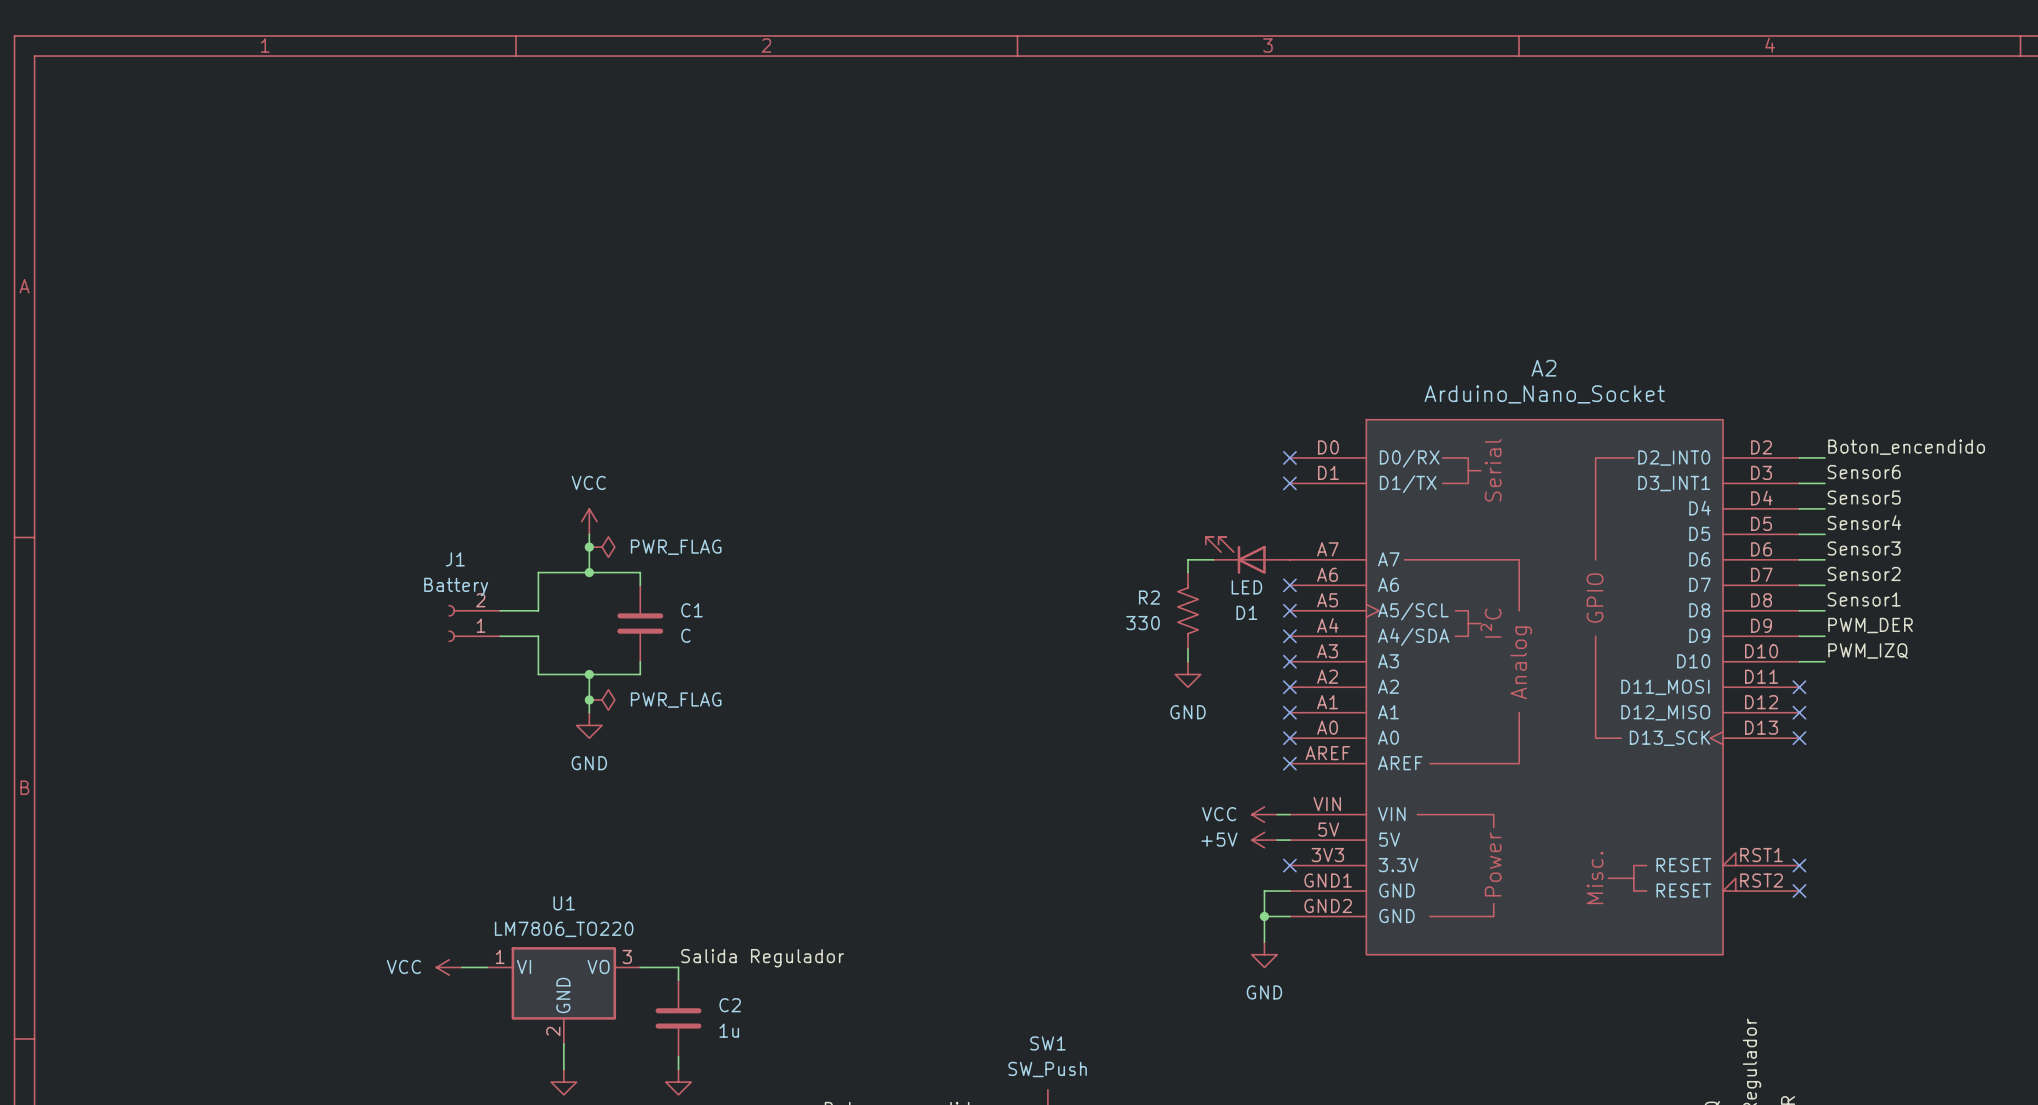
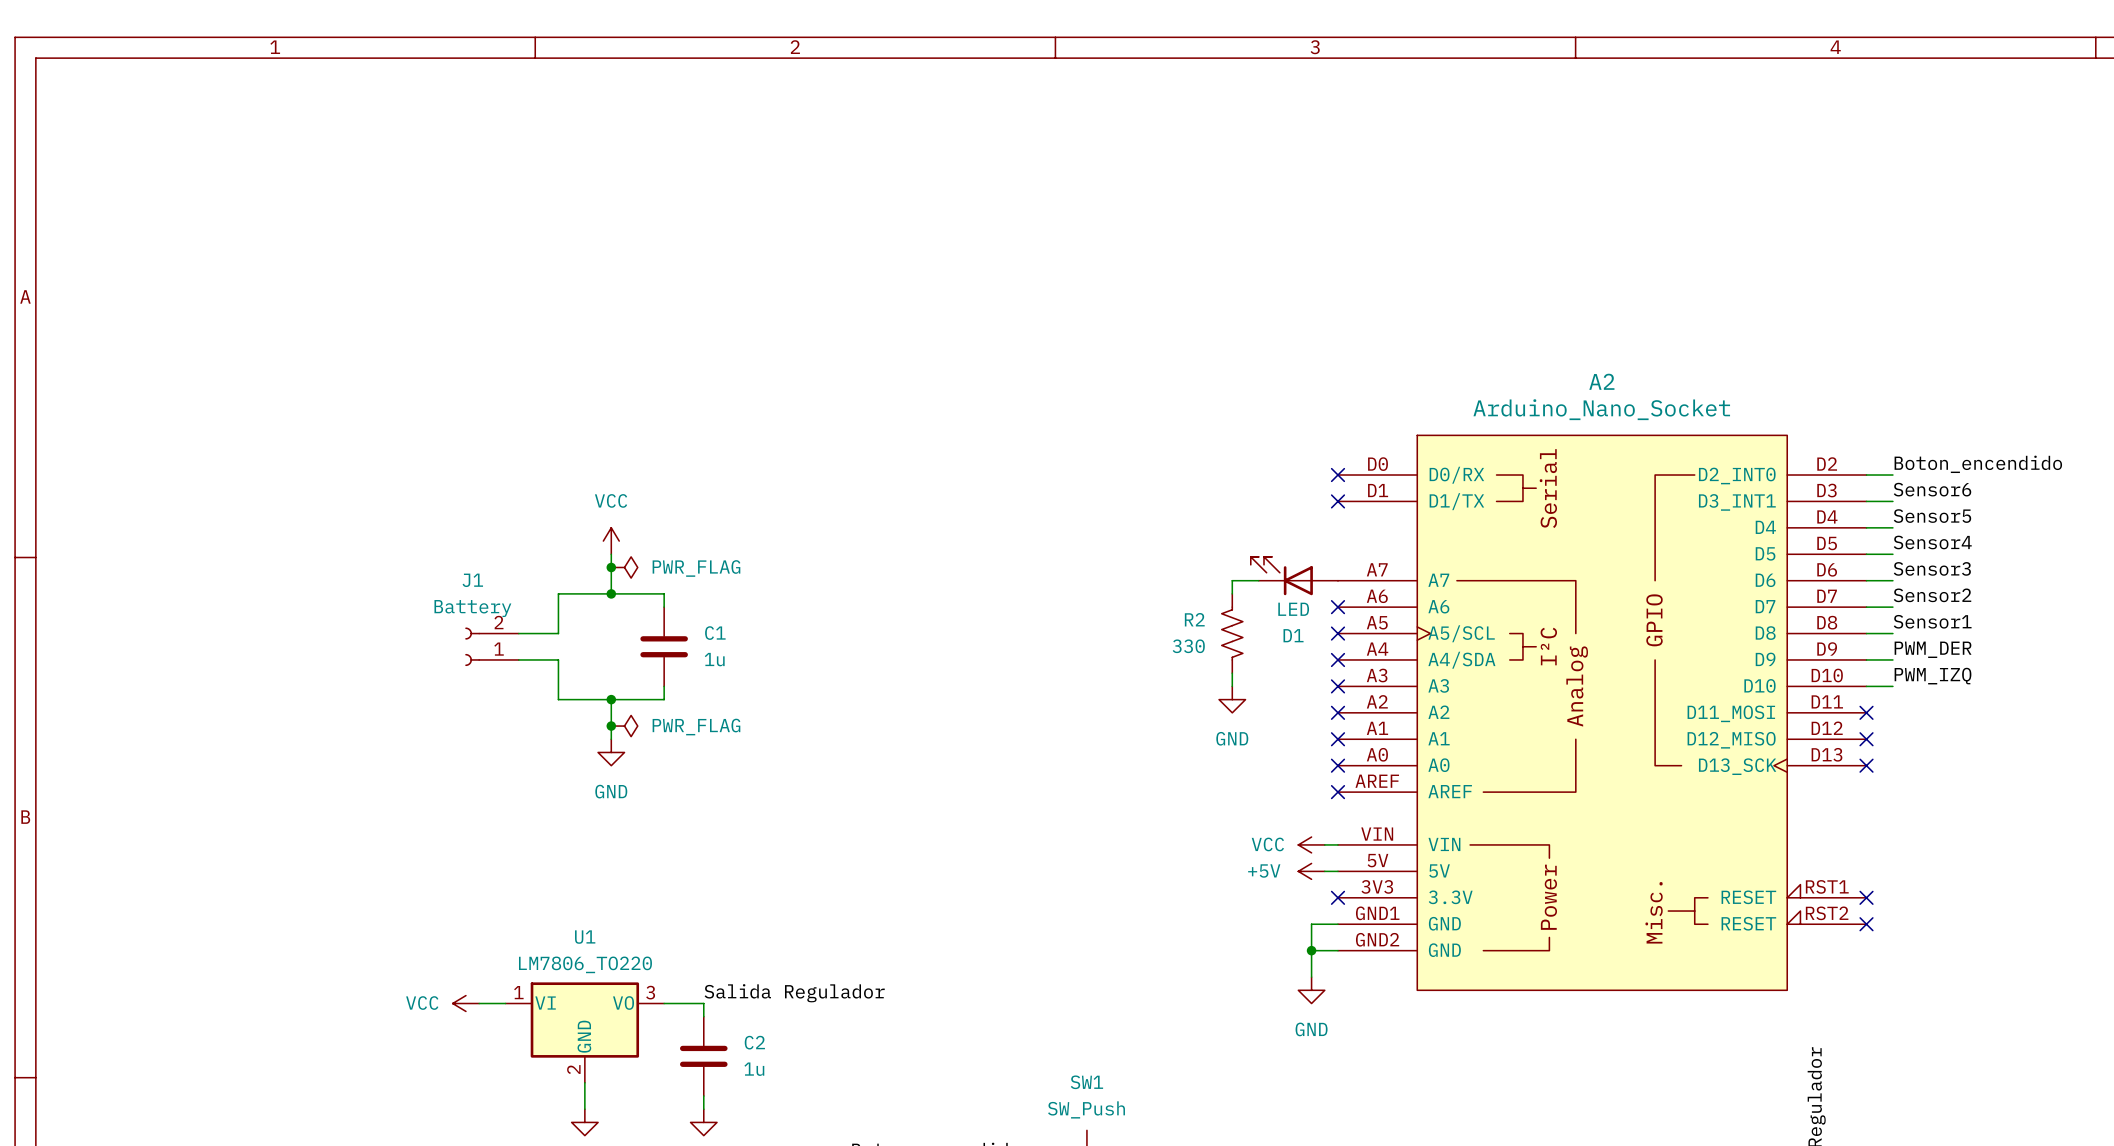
C1 value: C (685, 635) -> 1u (714, 659)

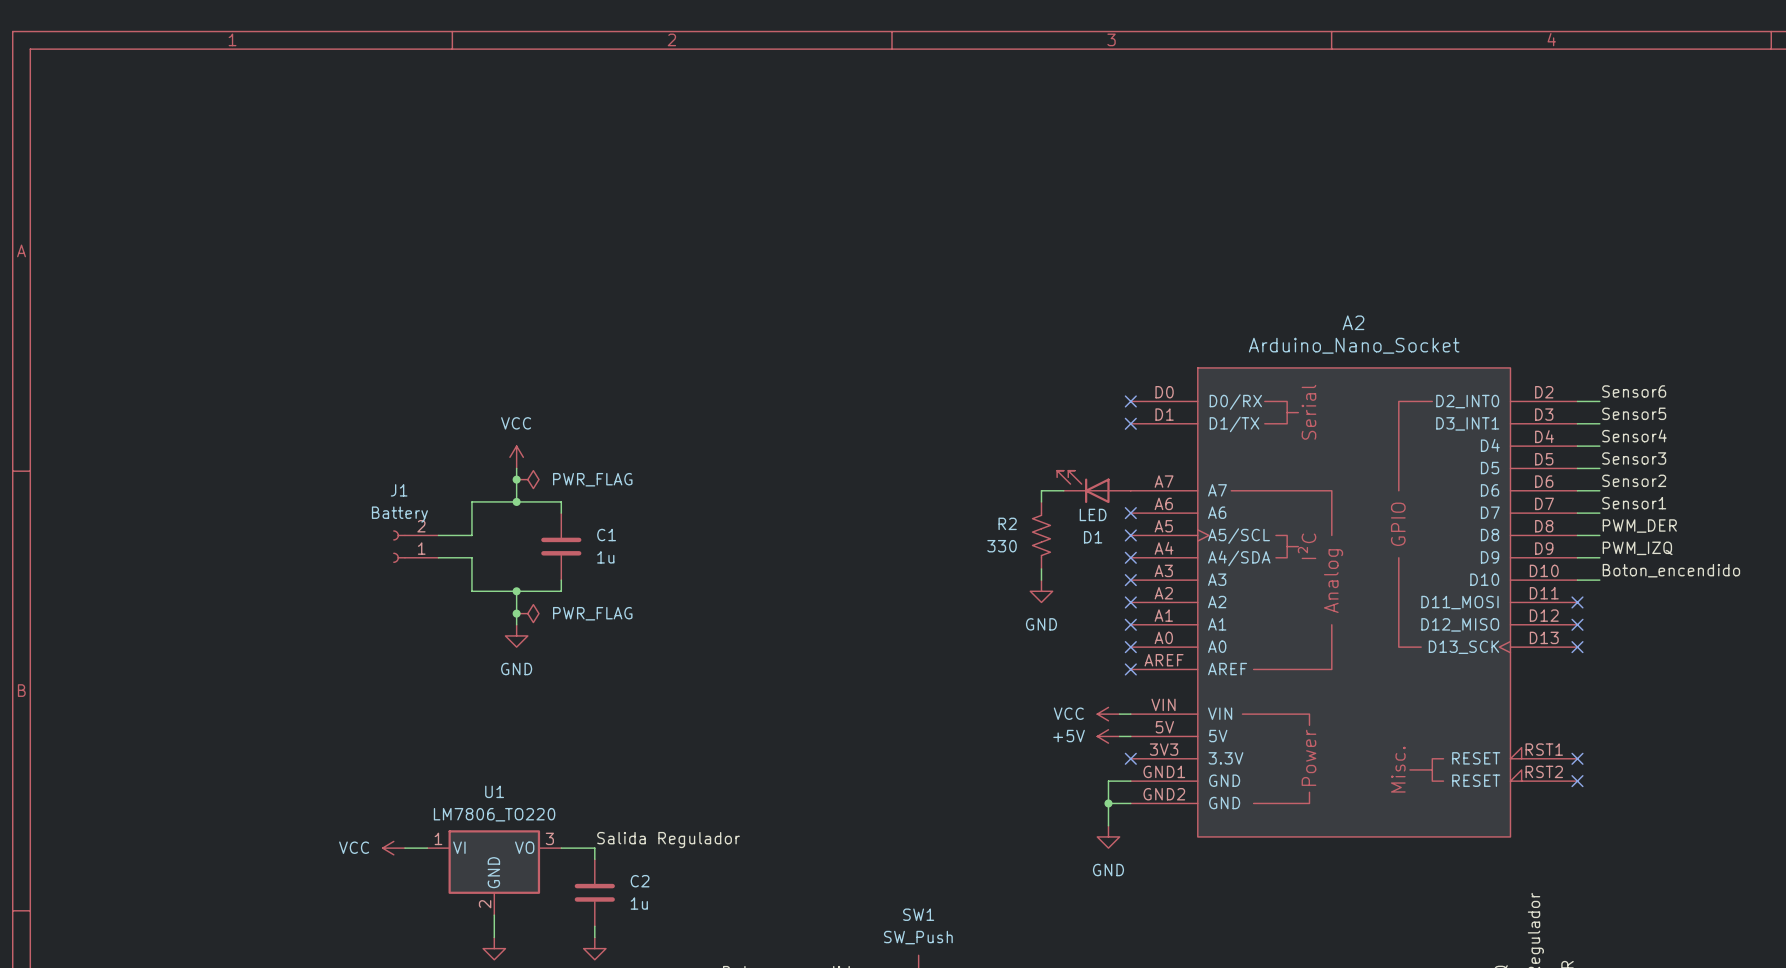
label: Boton_encendido (1978, 464) -> Sensor6 (1634, 391)
label: Sensor6 (1932, 489) -> Sensor5 (1634, 413)
label: Sensor5 (1932, 516) -> Sensor4 (1634, 435)
label: Sensor4 (1932, 542) -> Sensor3 (1634, 458)
label: Sensor3 (1932, 568) -> Sensor2 (1634, 480)
label: Sensor2 (1932, 595) -> Sensor1 (1634, 503)
label: Sensor1 (1932, 621) -> PWM_DER (1639, 526)
label: PWM_DER (1933, 649) -> PWM_IZQ (1637, 548)
label: PWM_IZQ (1933, 676) -> Boton_encendido (1671, 570)

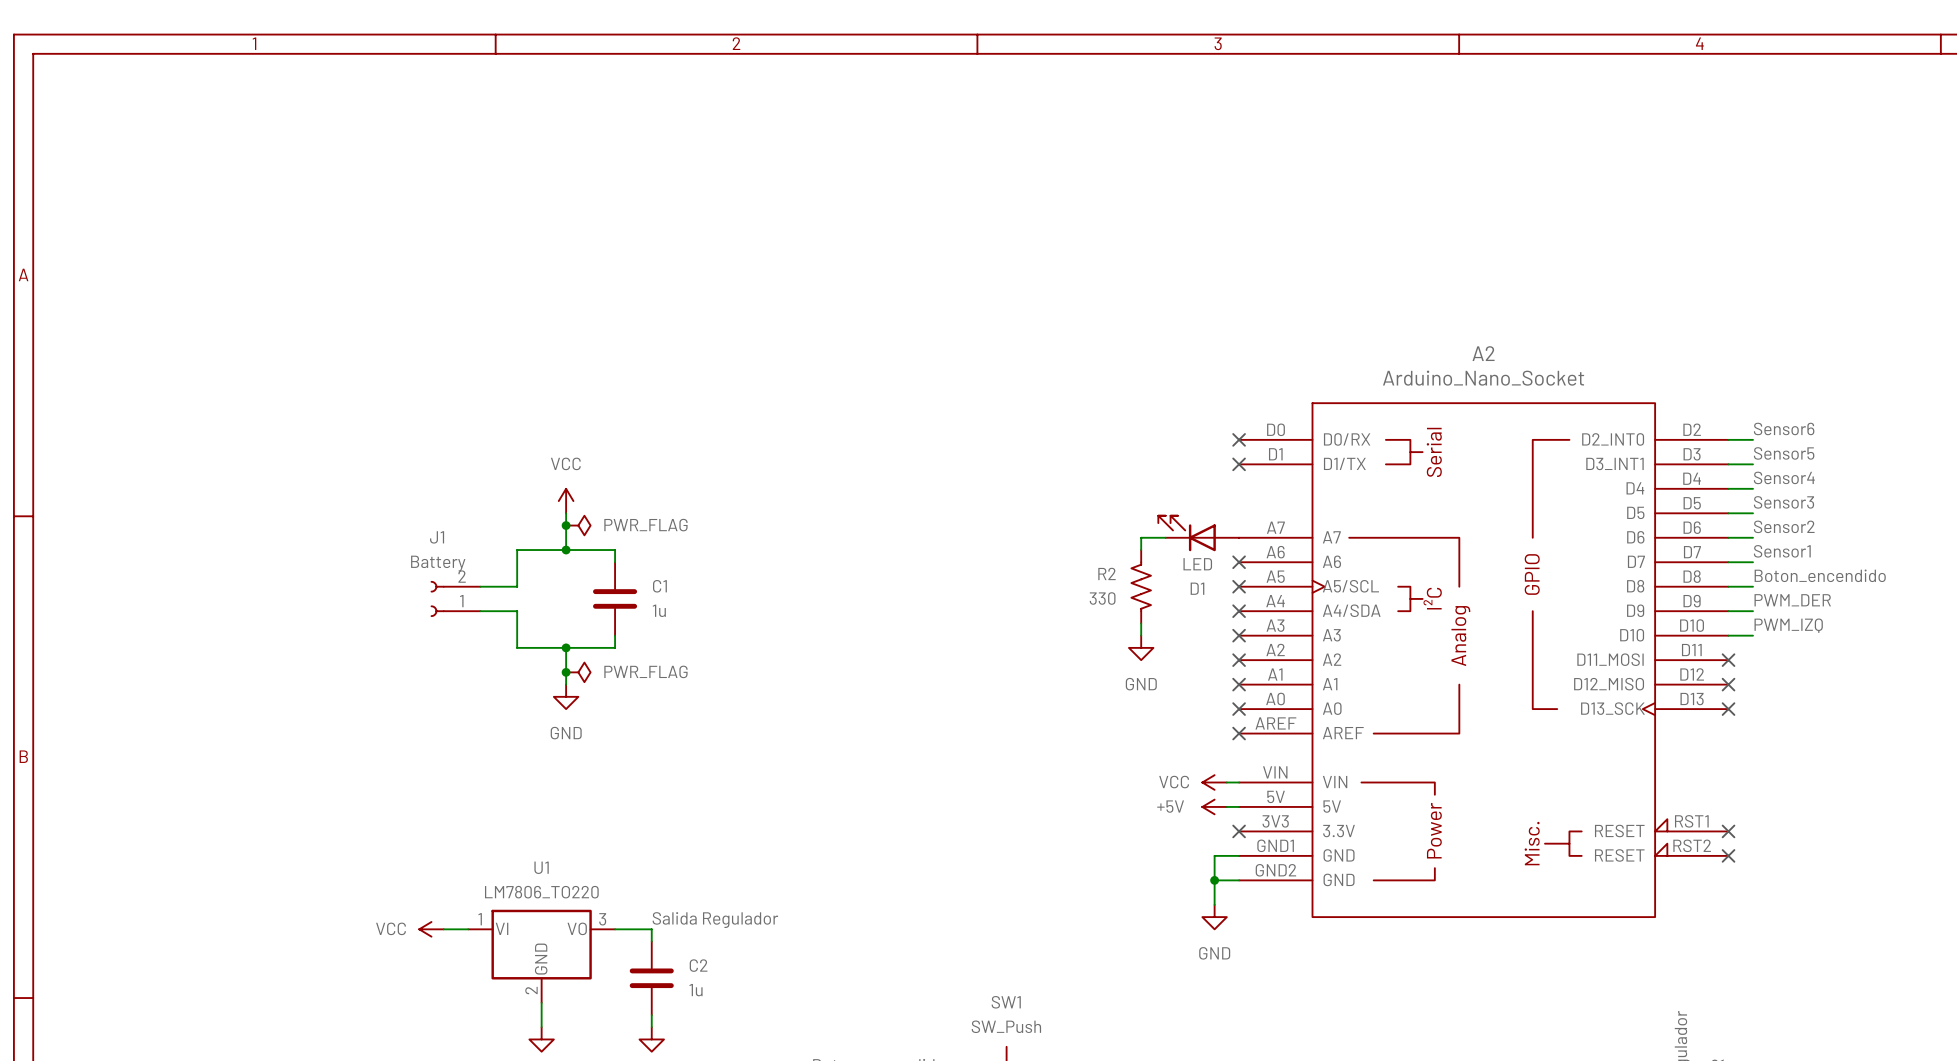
label: PWM_DER (1639, 526) -> Boton_encendido (1820, 575)
label: PWM_IZQ (1637, 548) -> PWM_DER (1792, 600)
label: Boton_encendido (1671, 570) -> PWM_IZQ (1788, 625)

